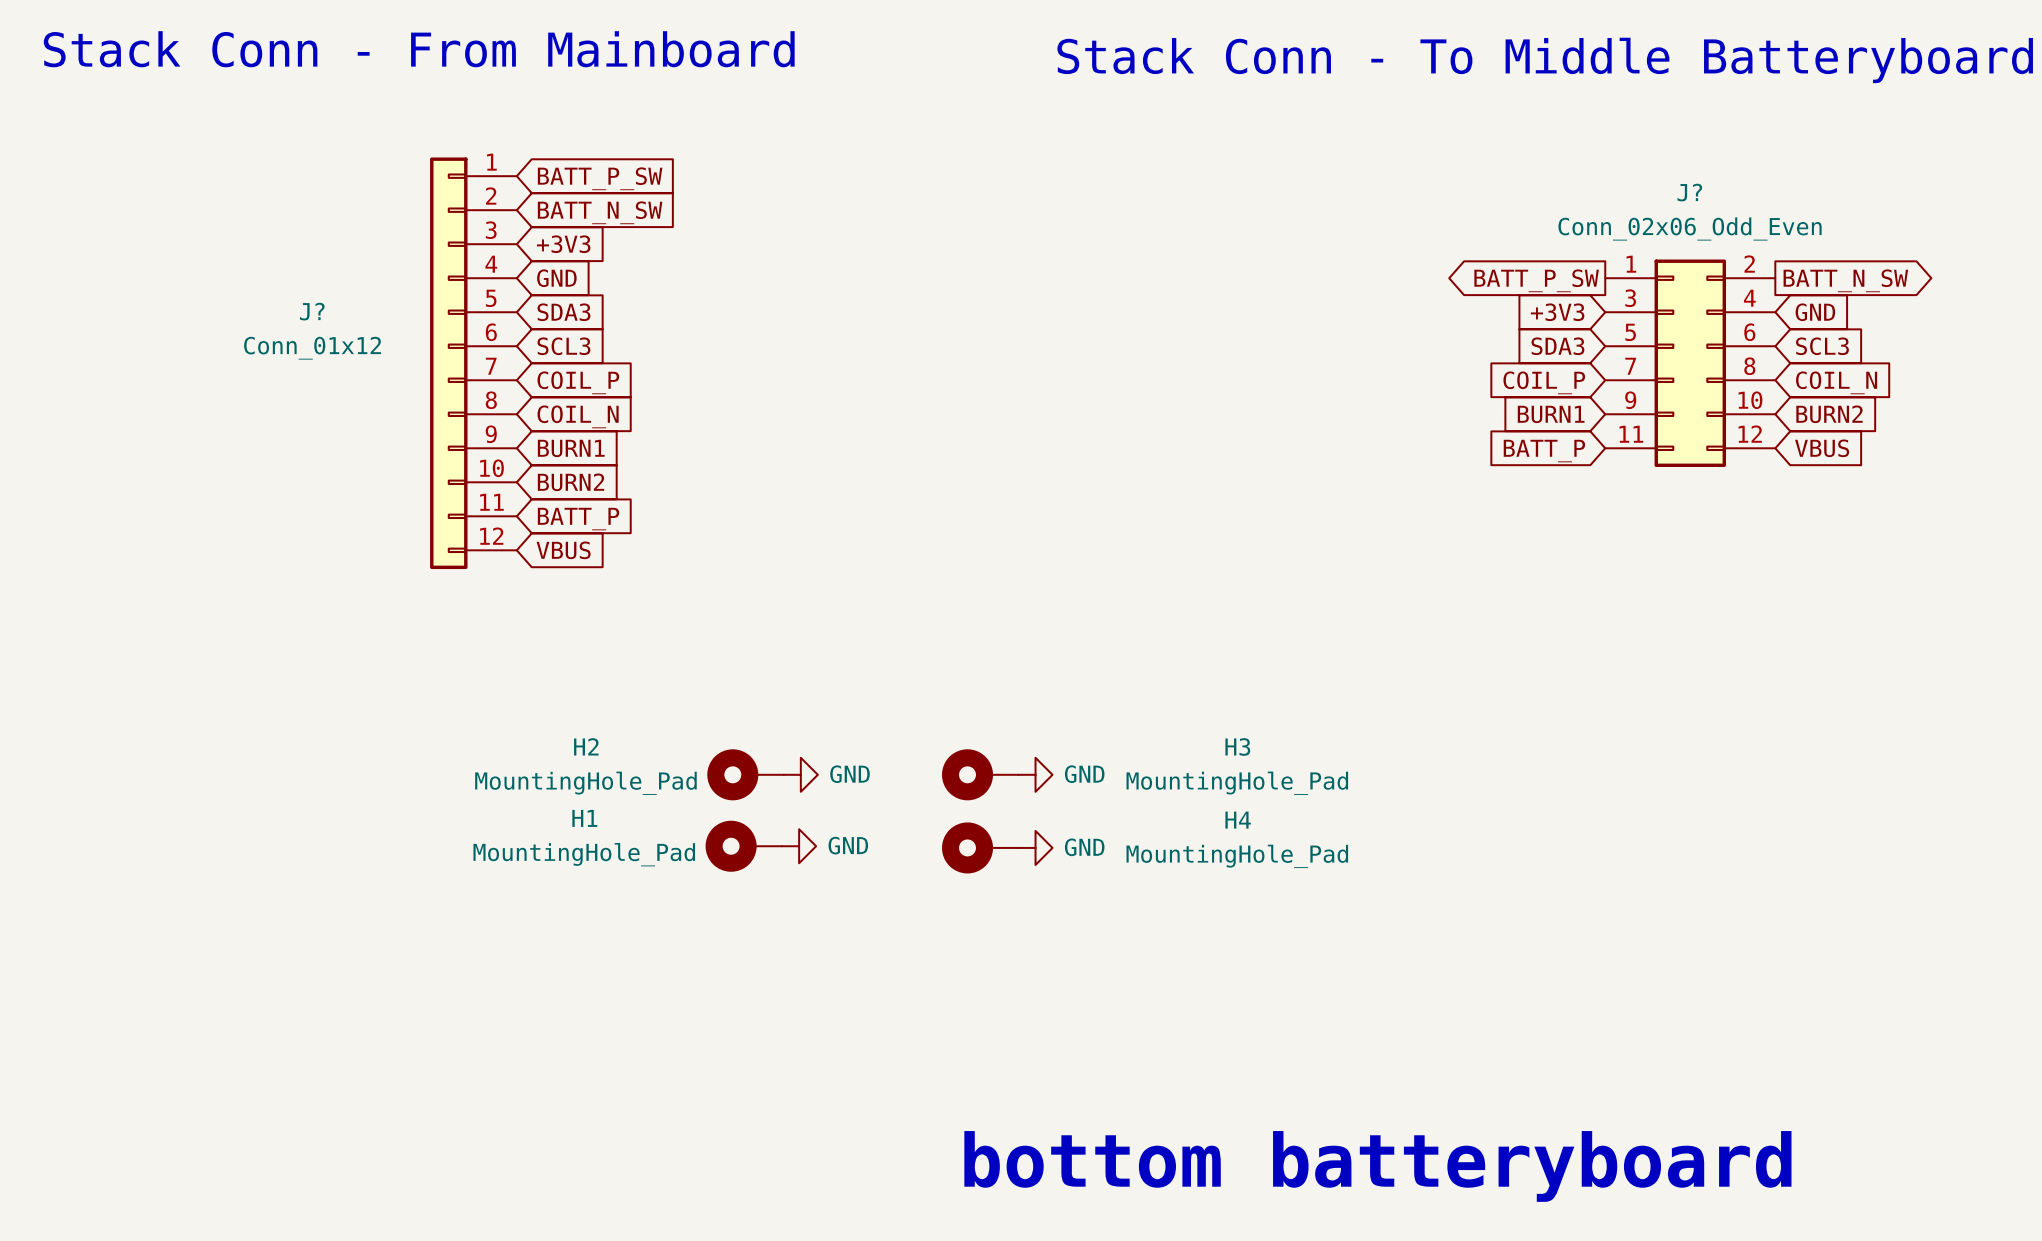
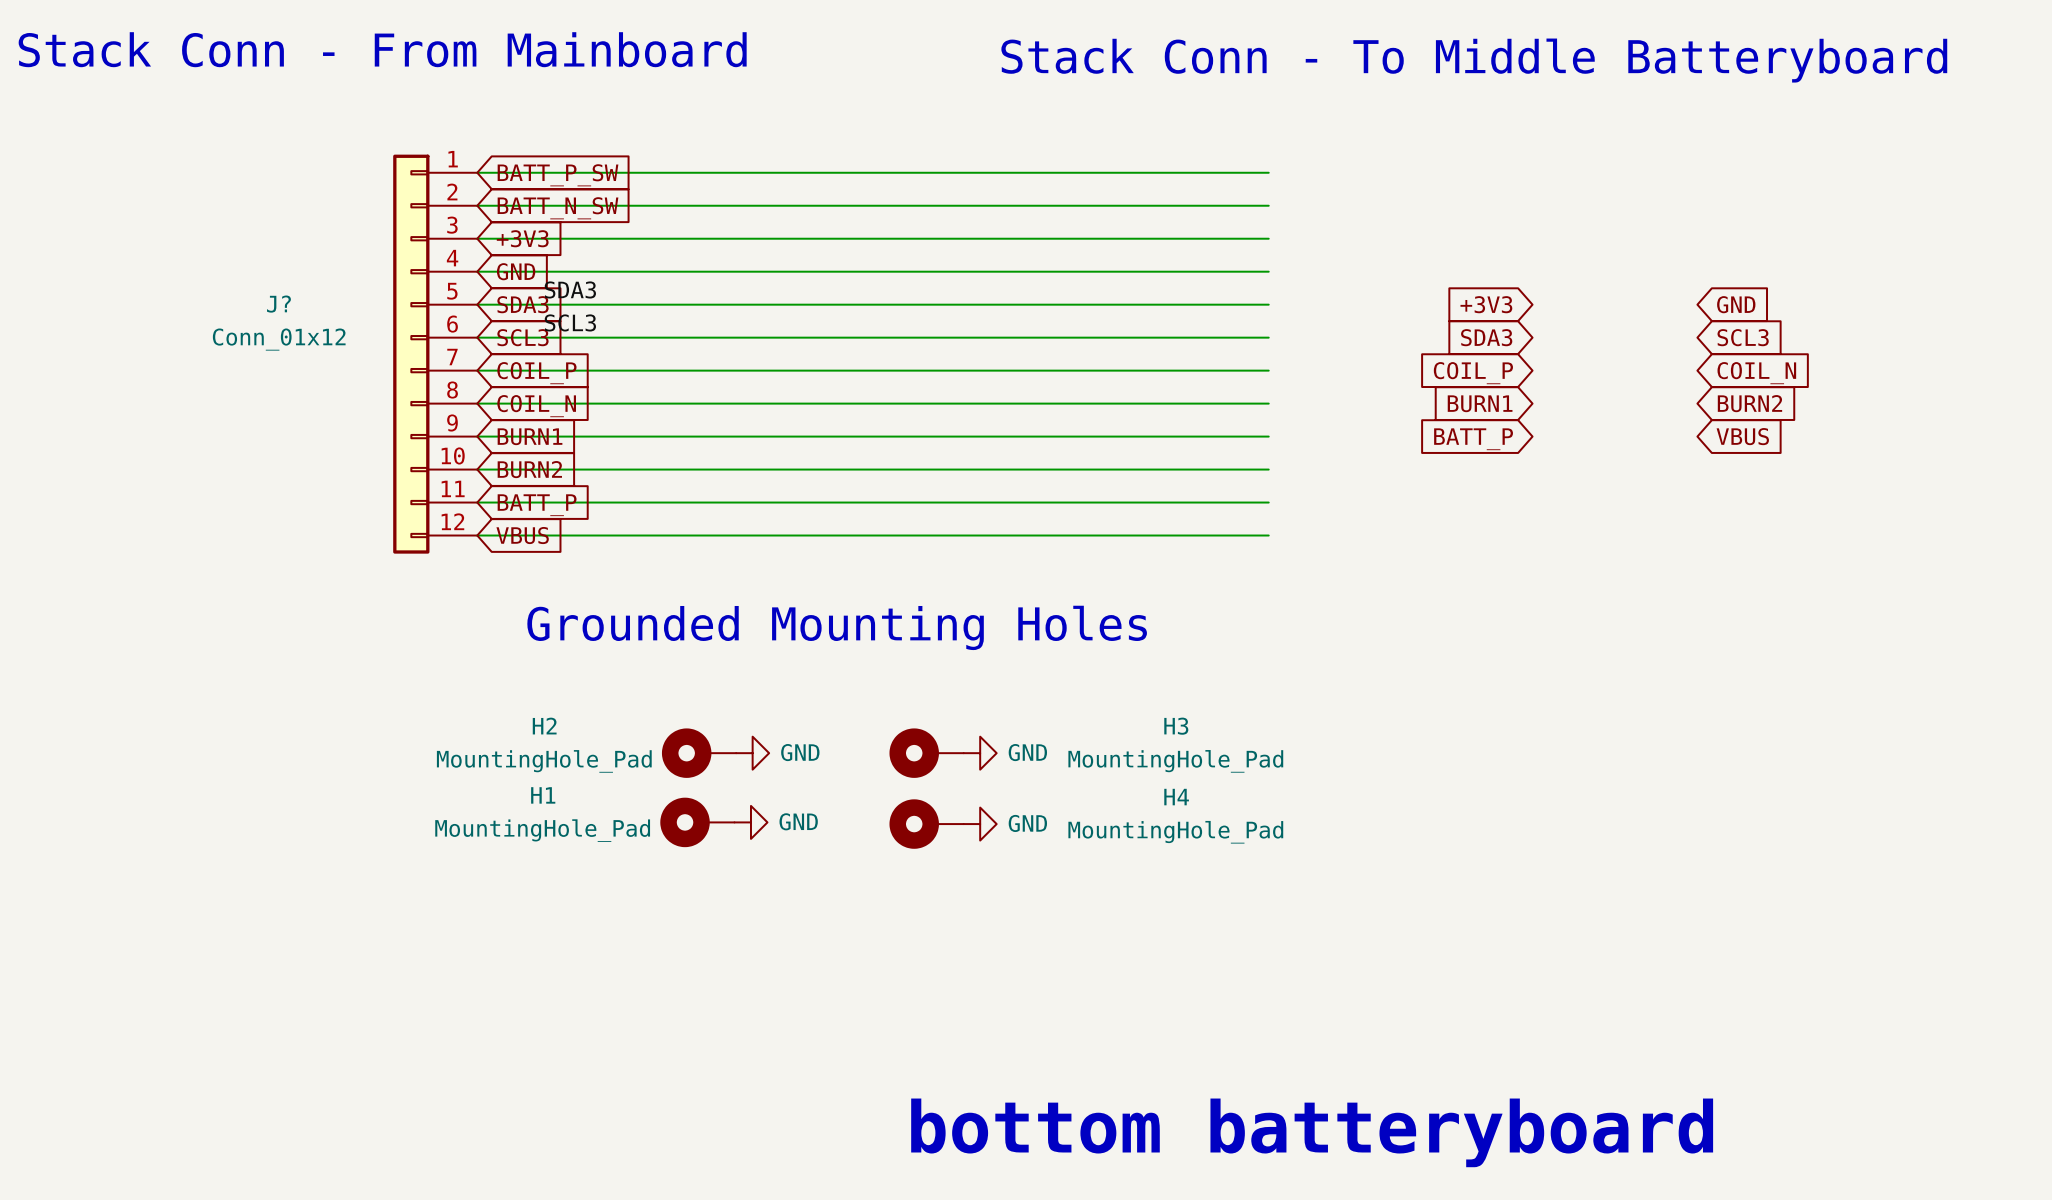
wire: none -> (477, 172) (1268, 172)
wire: none -> (477, 205) (1268, 205)
wire: none -> (477, 238) (1268, 238)
wire: none -> (477, 271) (1268, 271)
global label: BATT_P_SW (1536, 280) -> none
global label: BATT_N_SW (1845, 280) -> none
label: none -> SDA3 (570, 289)
wire: none -> (477, 304) (1268, 304)
label: none -> SCL3 (570, 322)
wire: none -> (477, 337) (1268, 337)
J?: Conn_02x06_Odd_Even (1690, 363) -> none
wire: none -> (477, 370) (1268, 370)
wire: none -> (477, 403) (1268, 403)
wire: none -> (477, 436) (1268, 436)
wire: none -> (477, 469) (1268, 469)
wire: none -> (477, 502) (1268, 502)
wire: none -> (477, 535) (1268, 535)
text: none -> Grounded Mounting Holes (837, 627)

